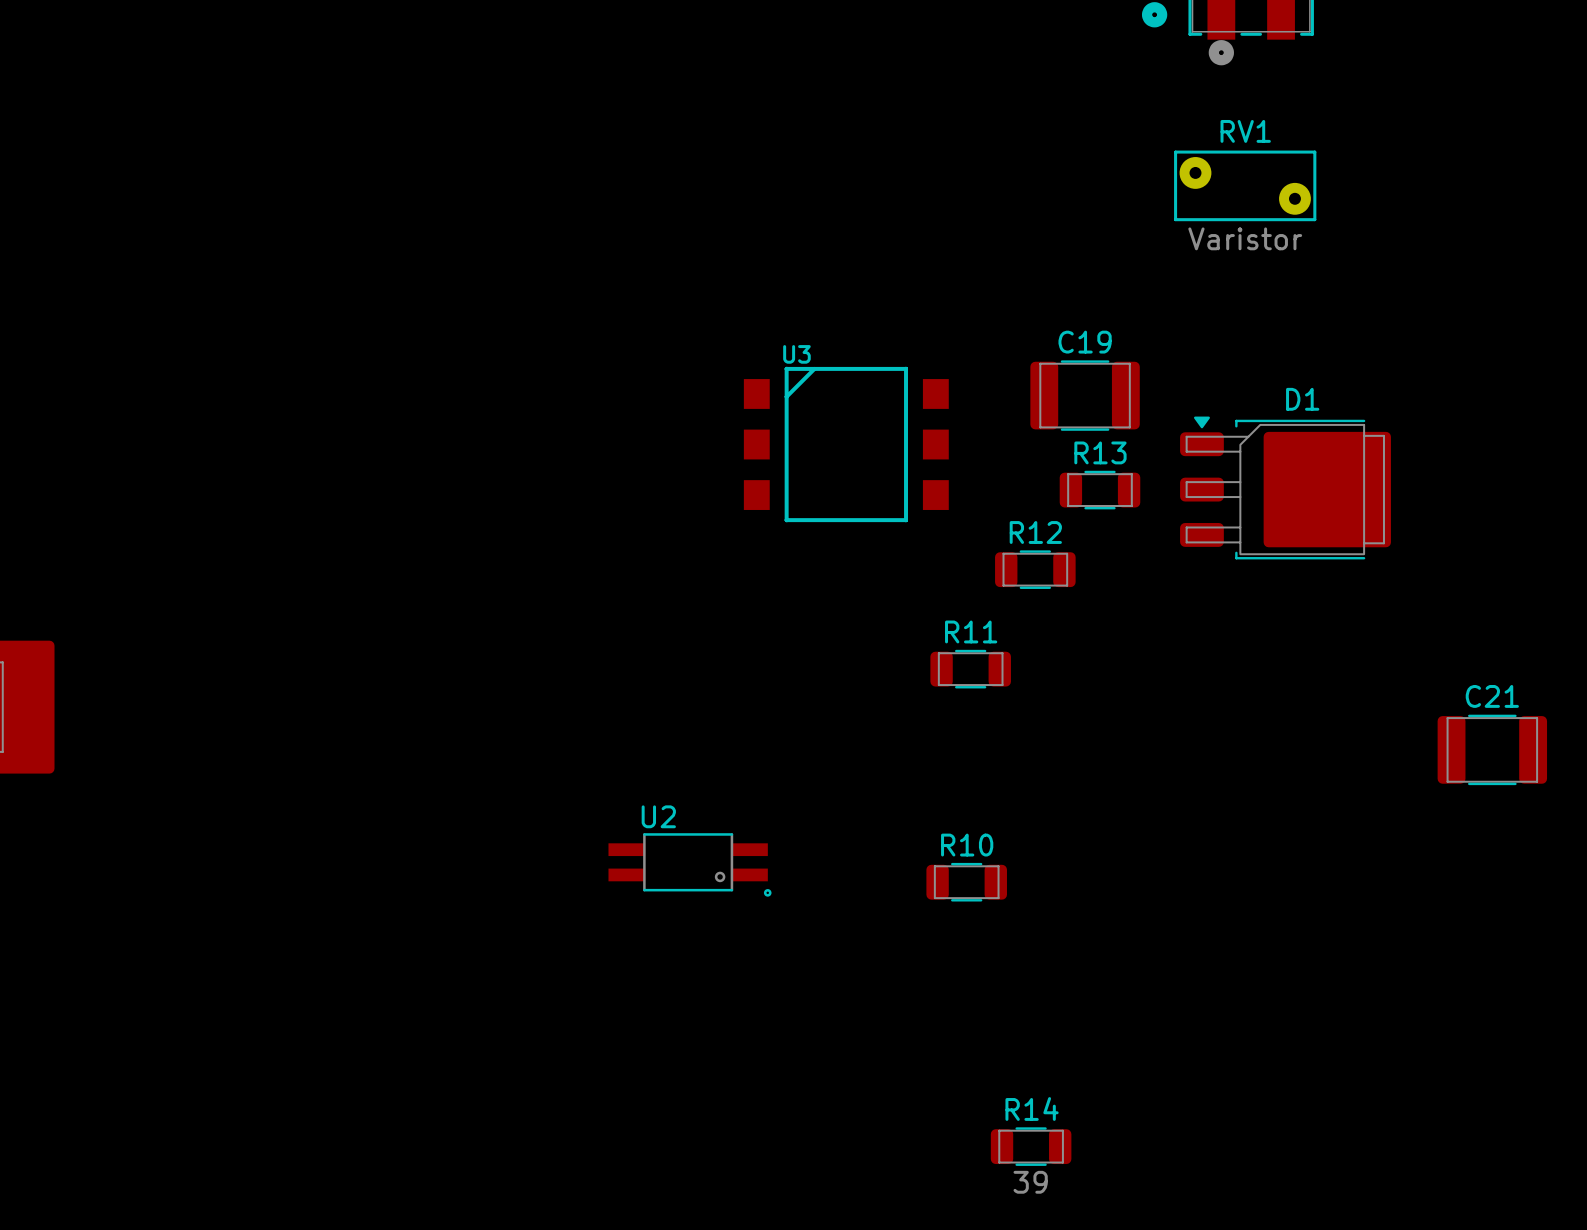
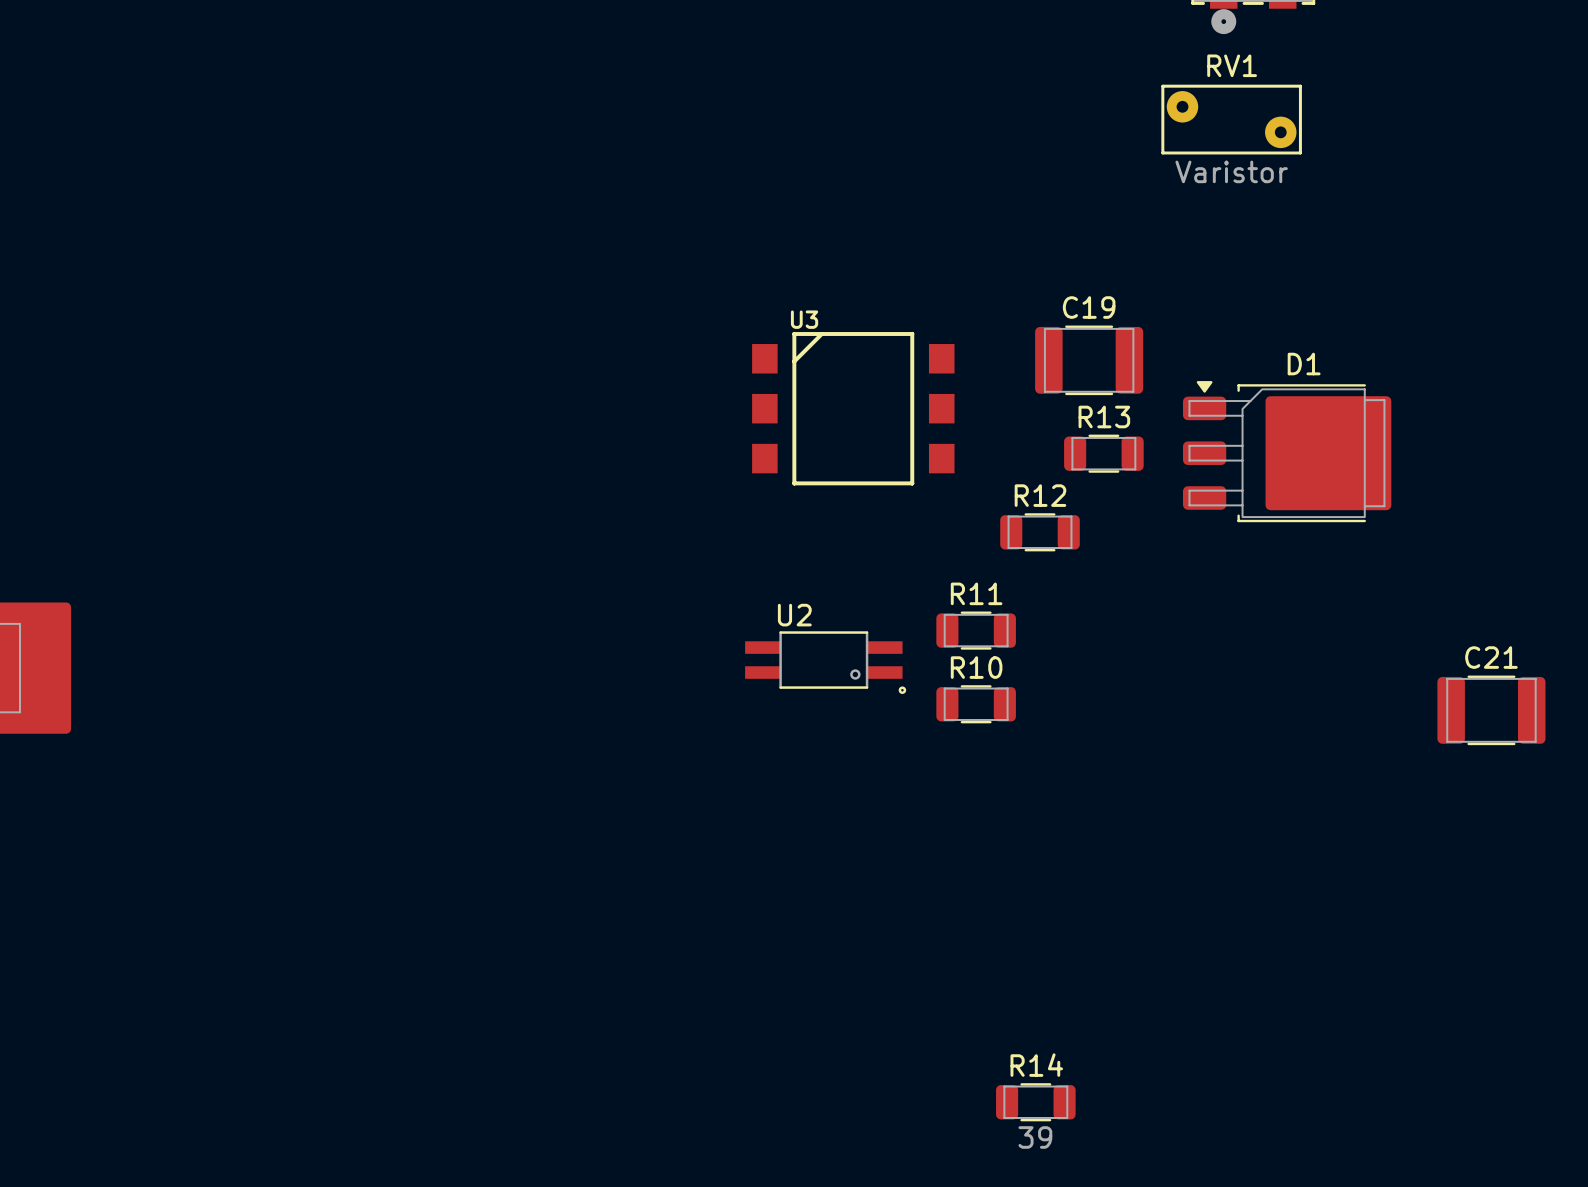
RV1 position: (1245, 185) -> (1231, 119)
U2 position: (690, 864) -> (825, 662)
R10 position: (966, 882) -> (976, 704)

